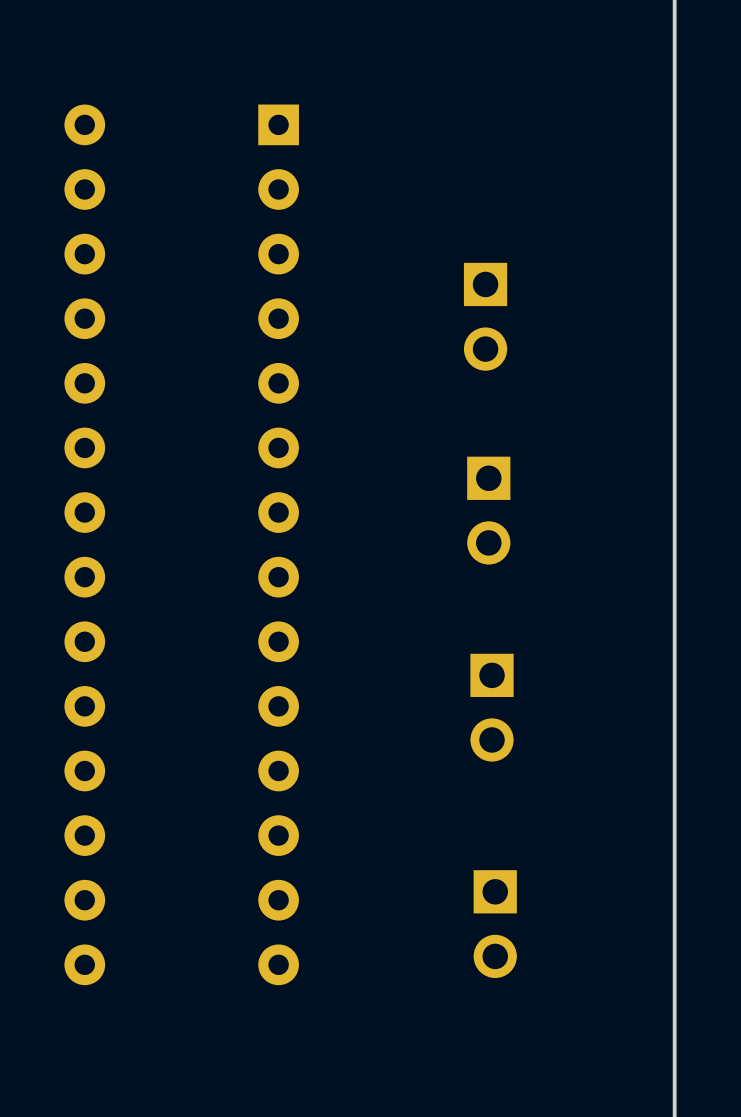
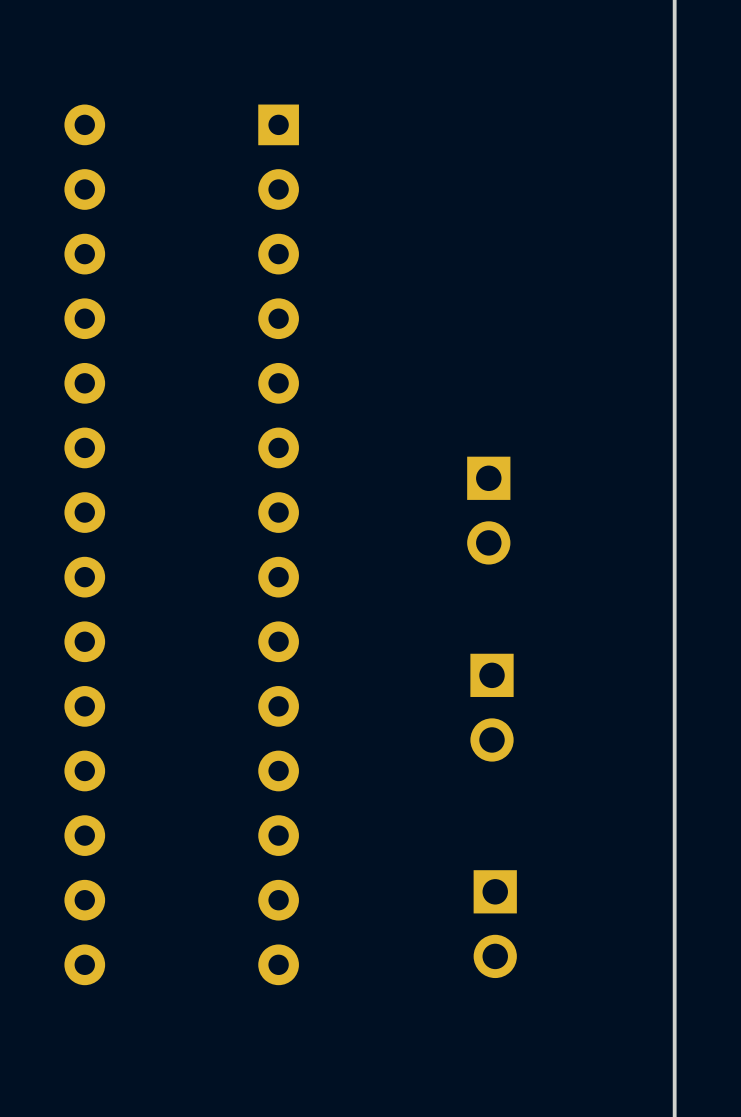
part: (485, 316) -> none

